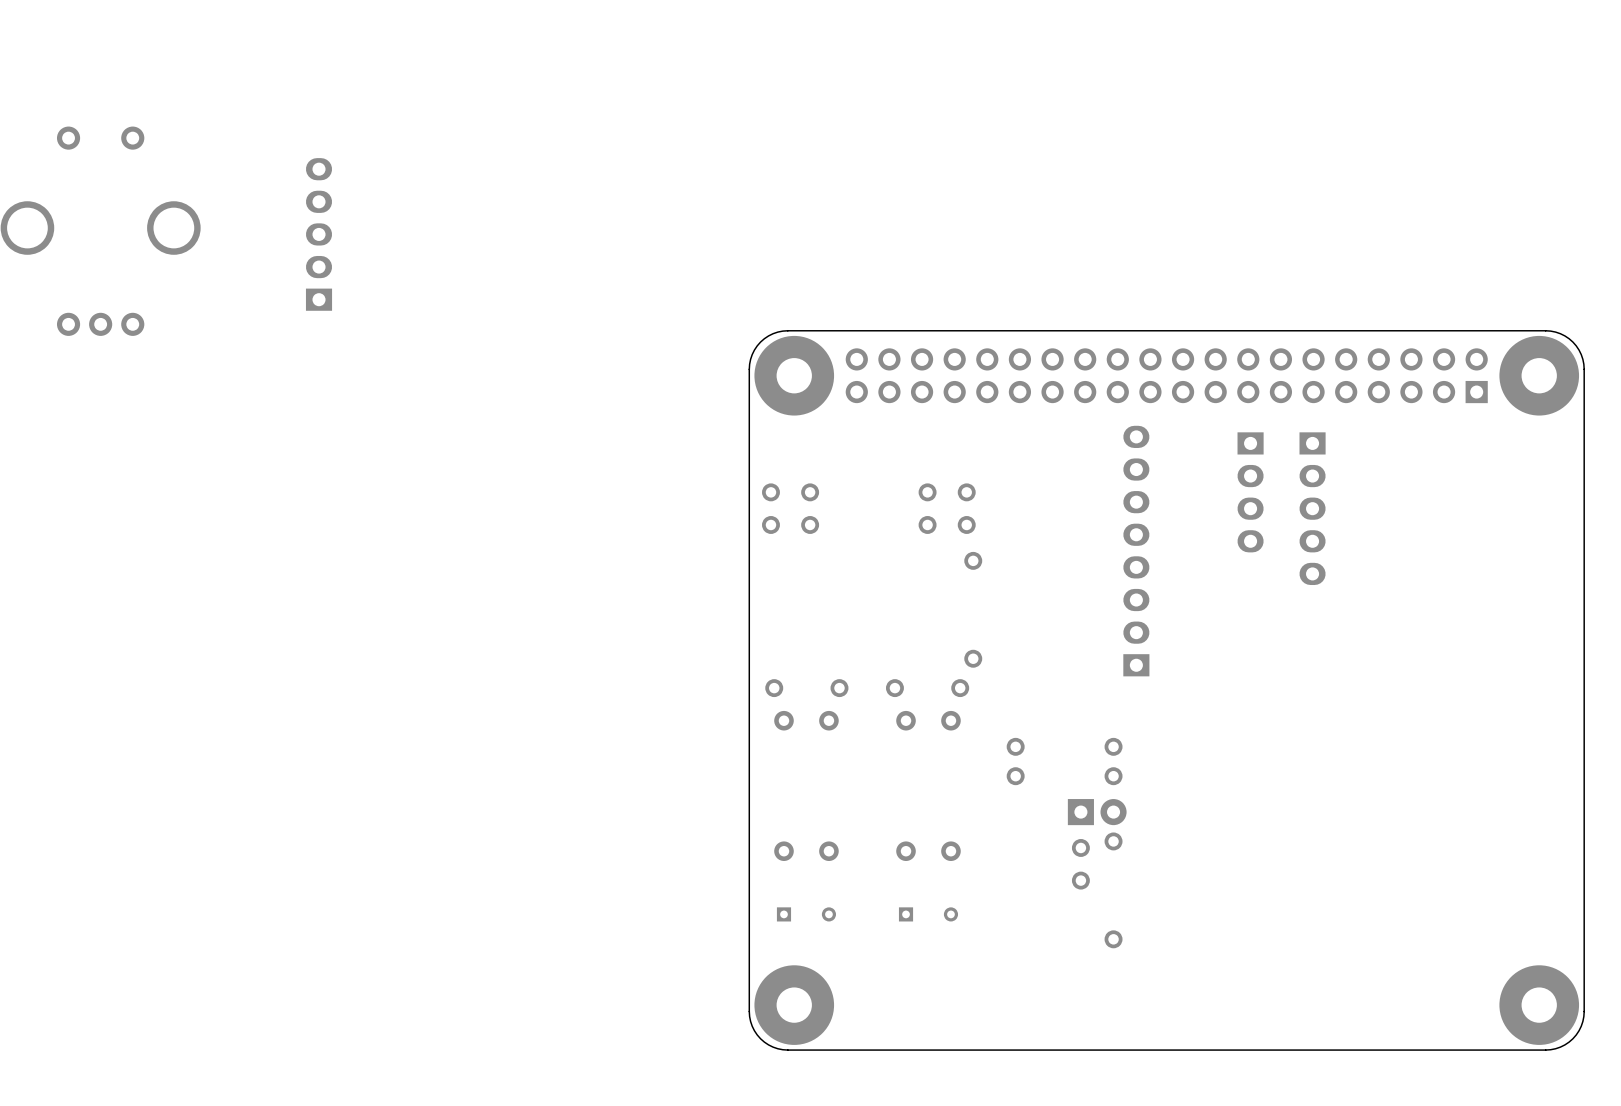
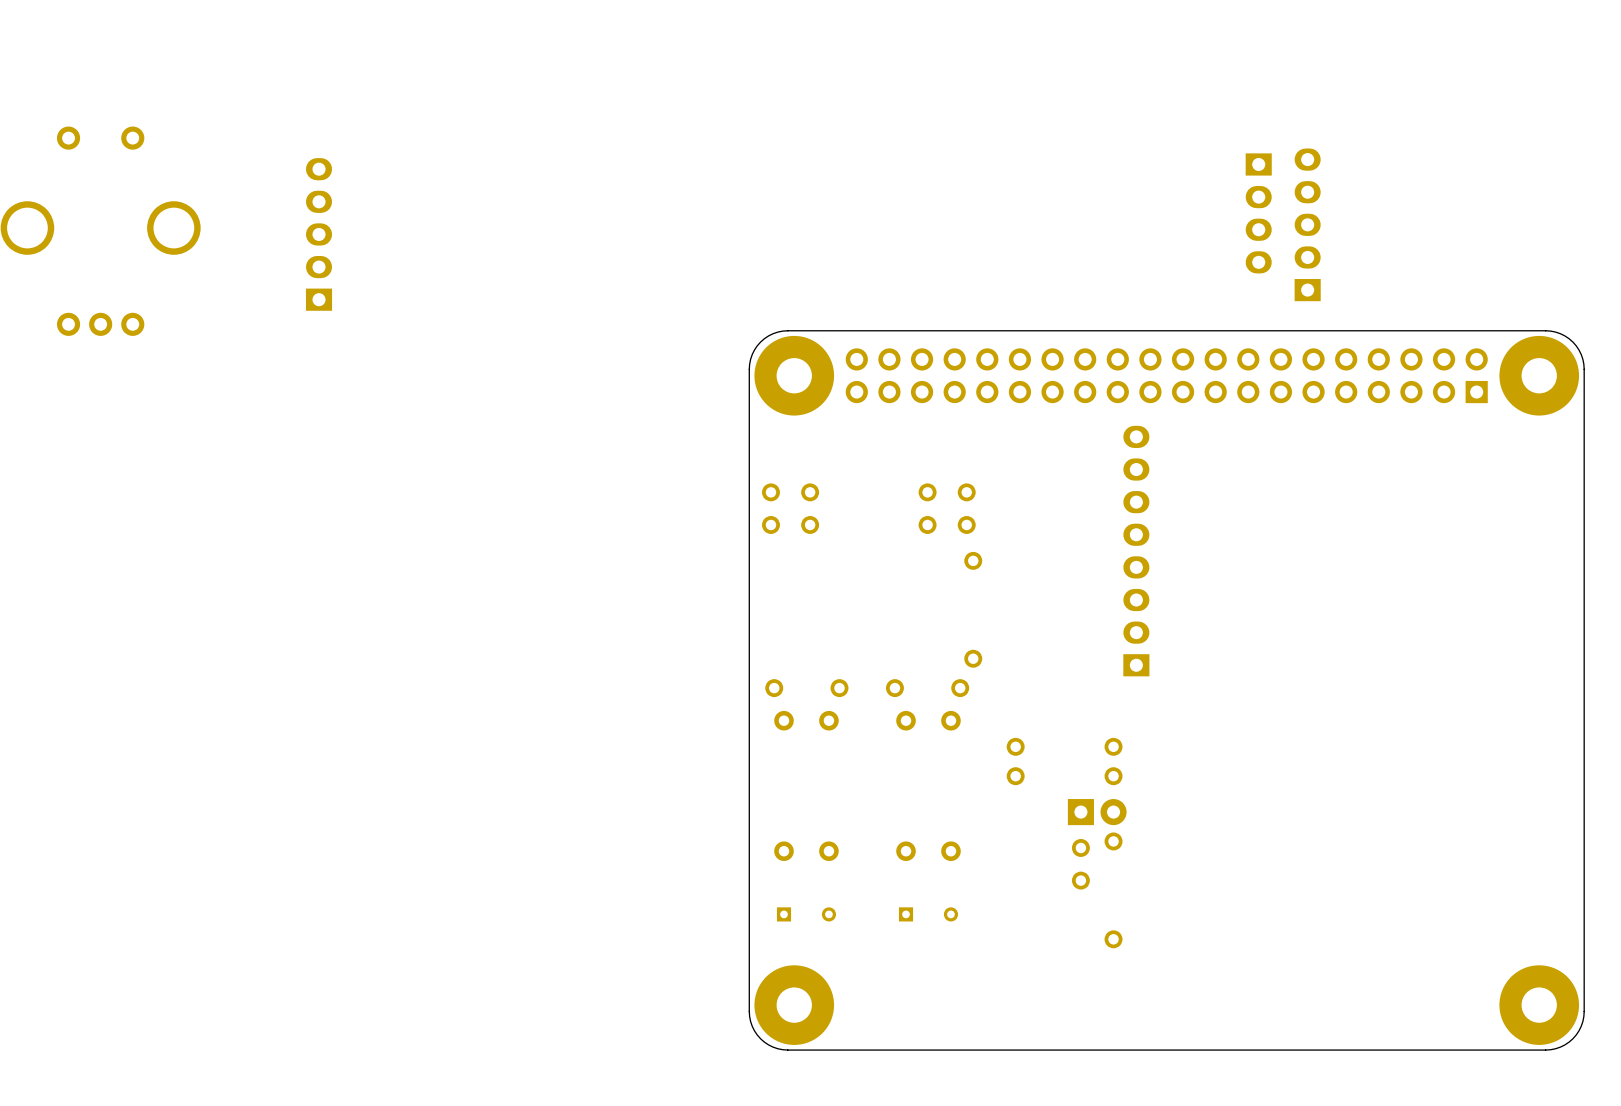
part position: (1250, 492) -> (1258, 213)
part rotation: 0° (1312, 508) -> 180° (1307, 224)
part position: (1312, 508) -> (1307, 224)

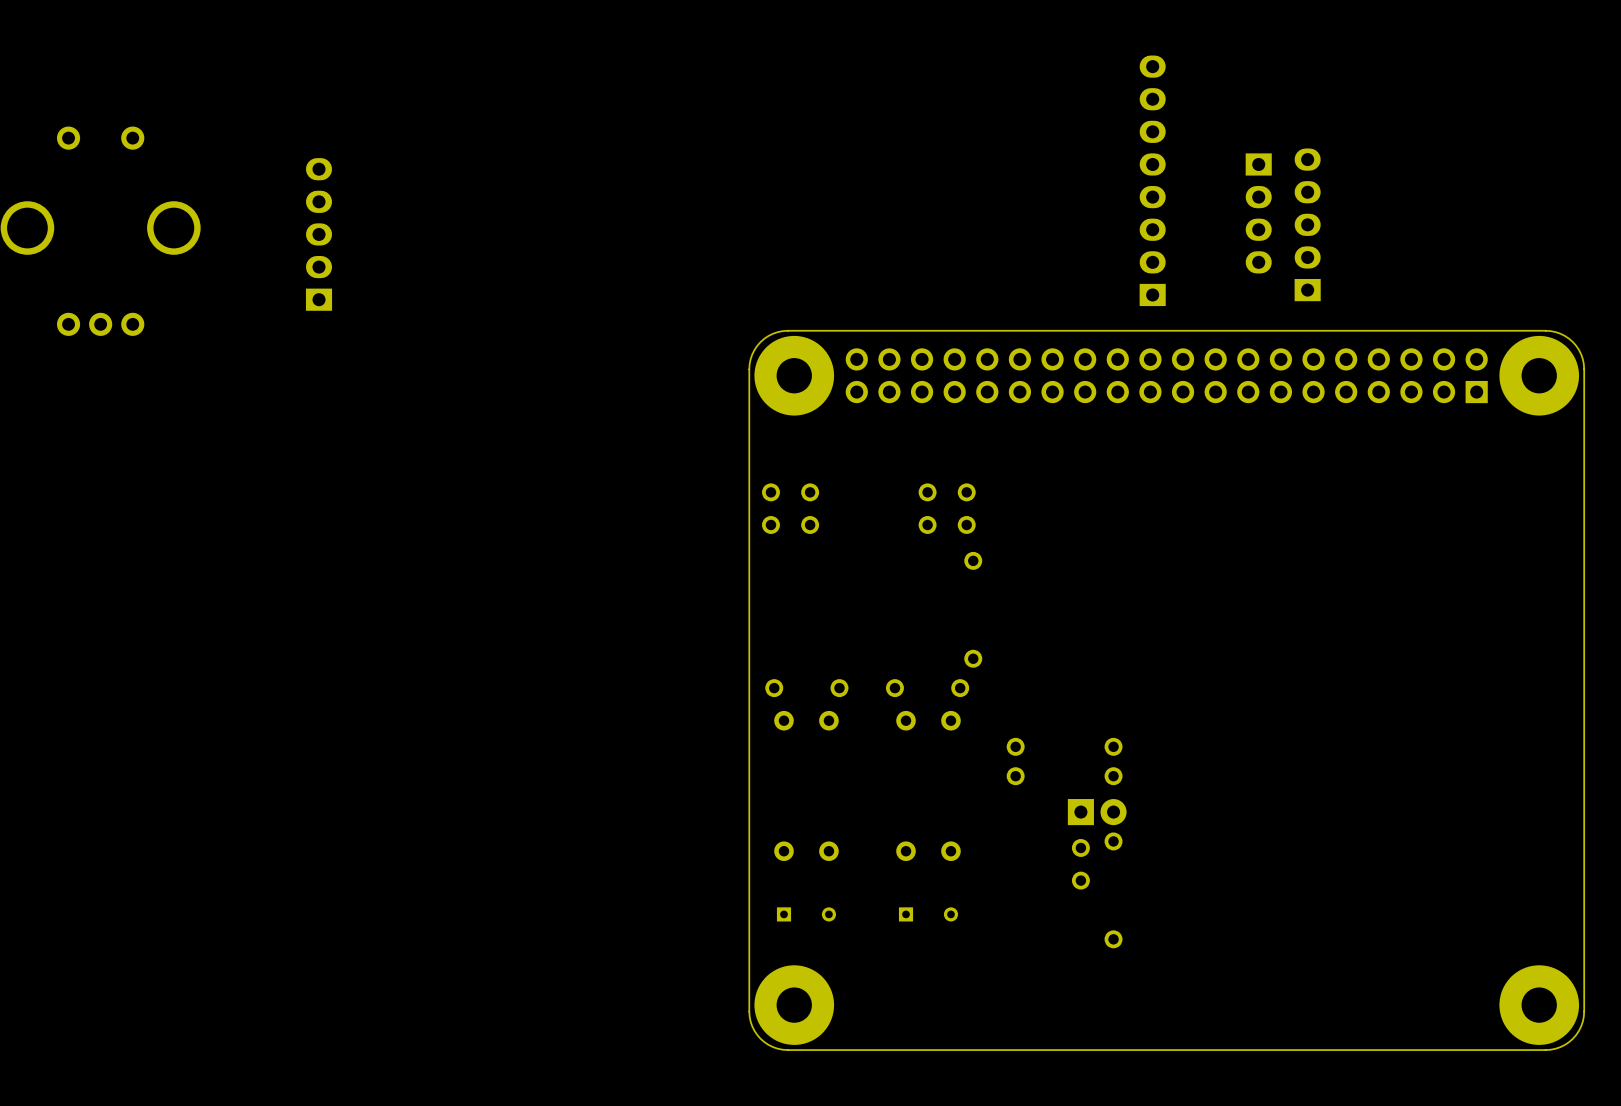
part: none -> (1152, 180)
part: (1136, 551) -> none

